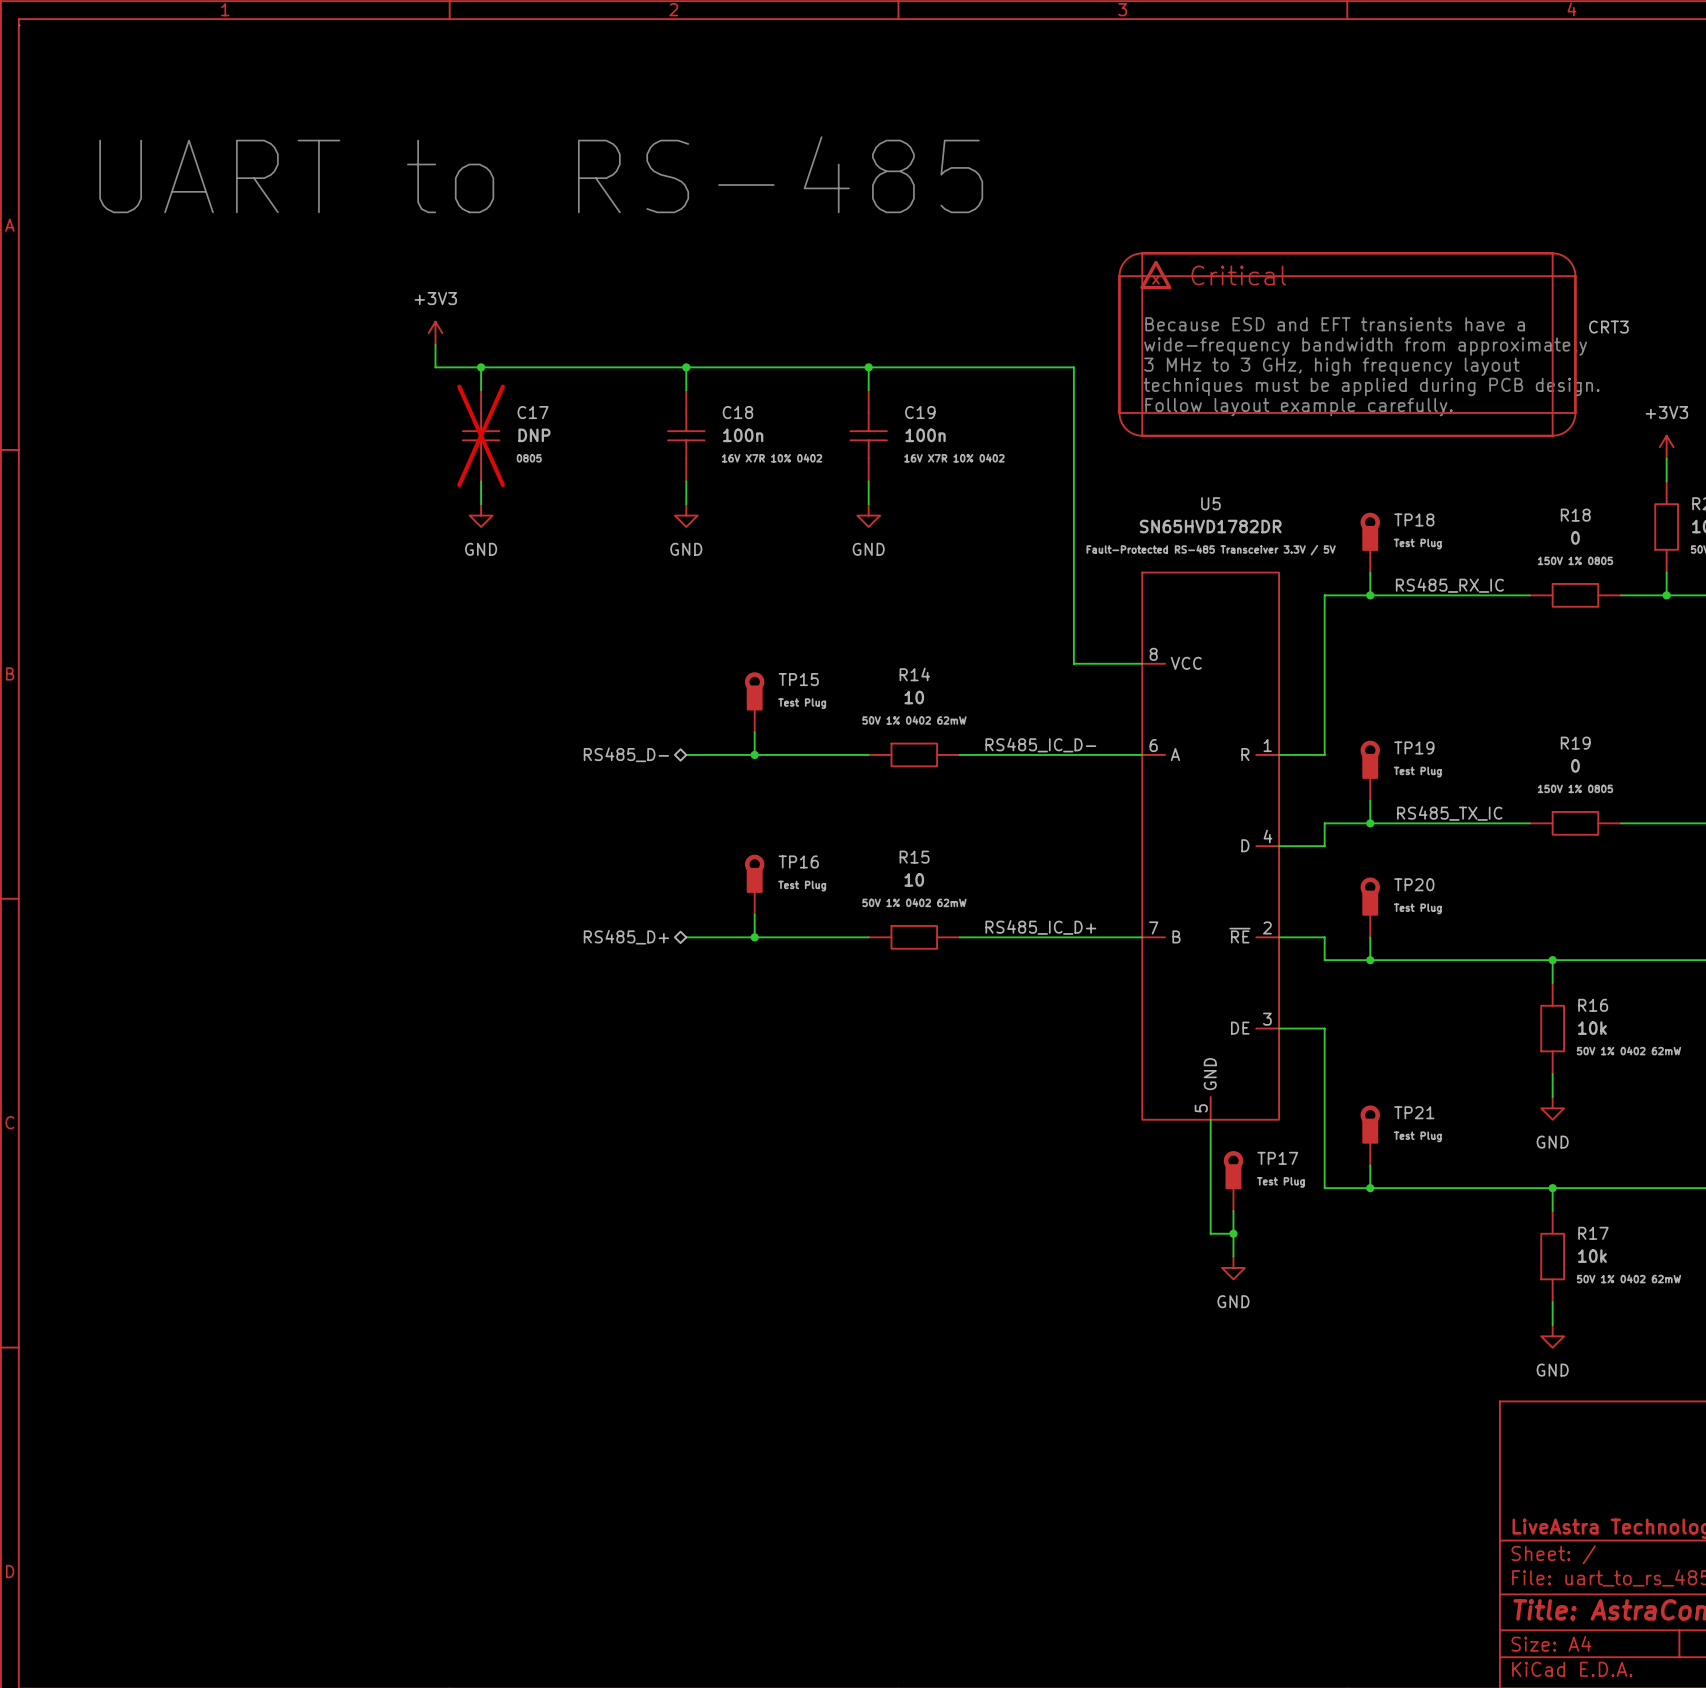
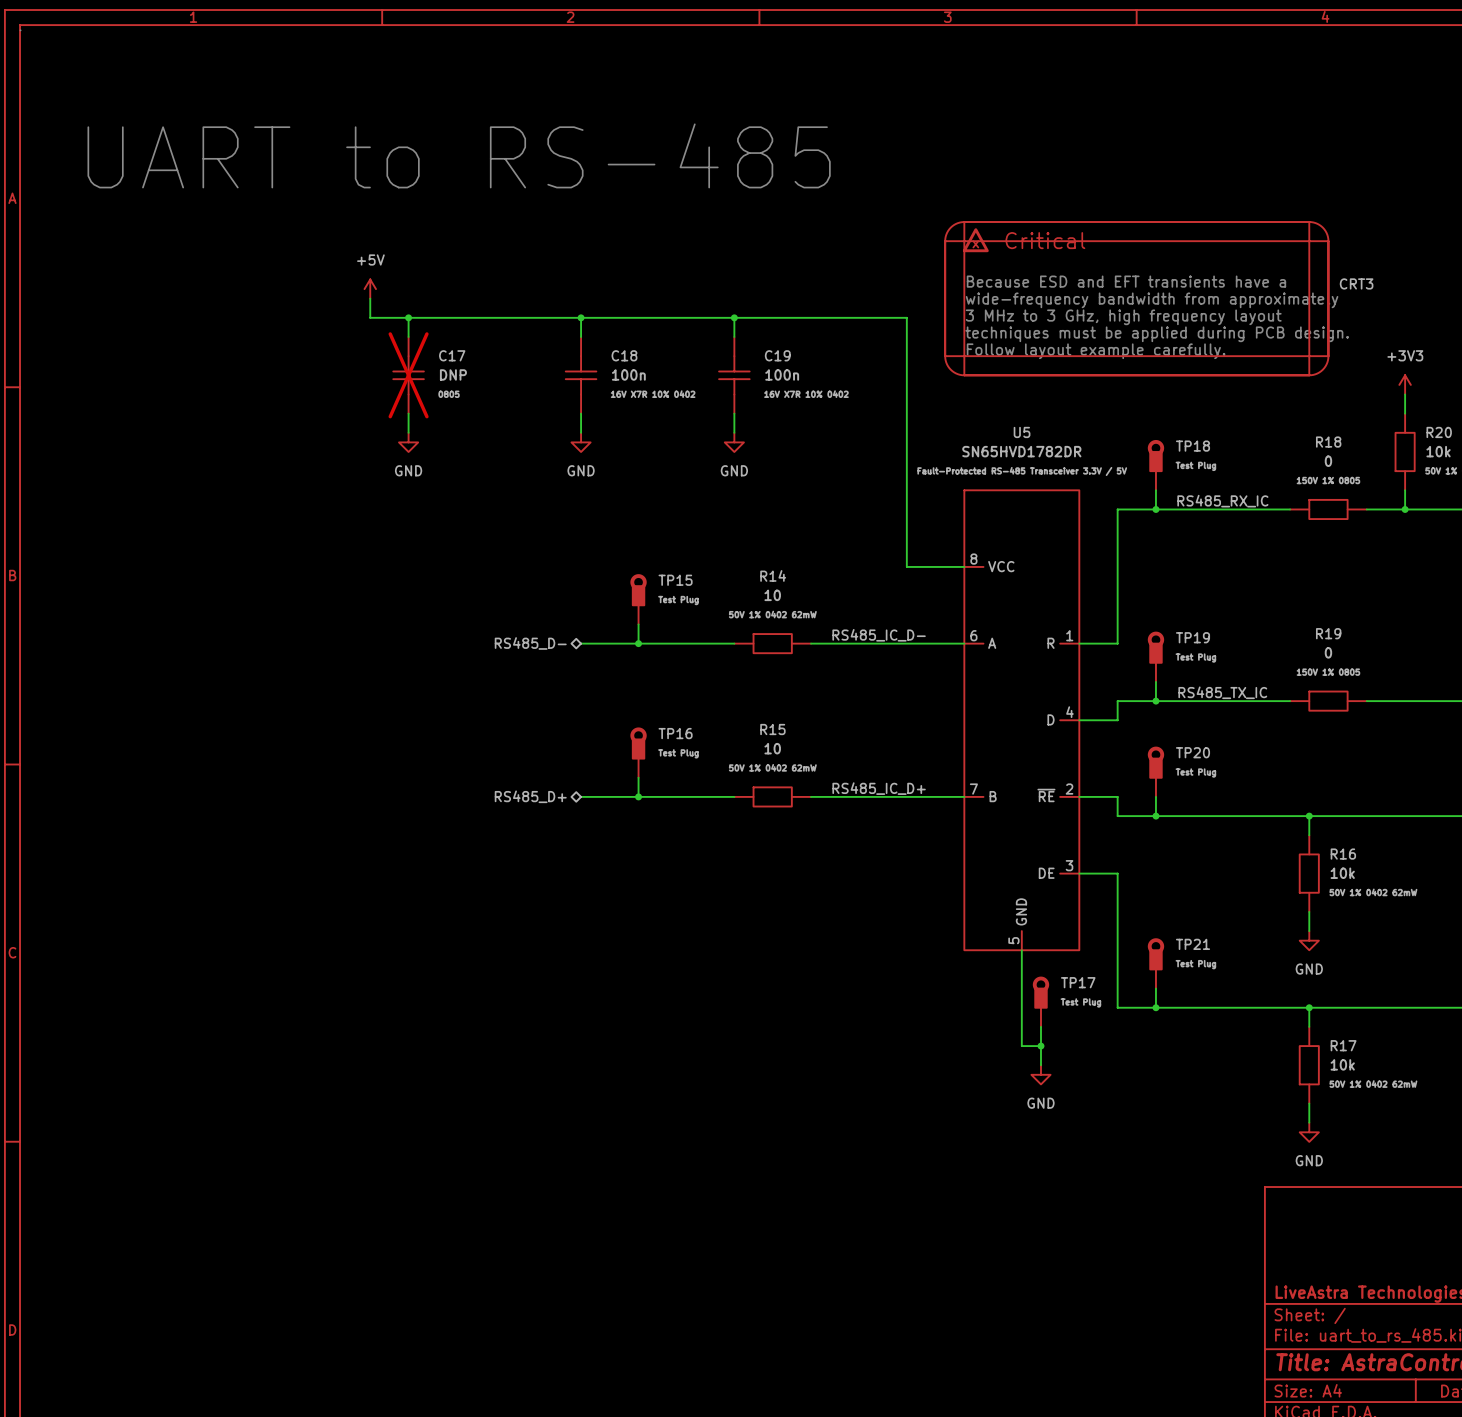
power symbol: +3V3 (435, 333) -> +5V (370, 289)

